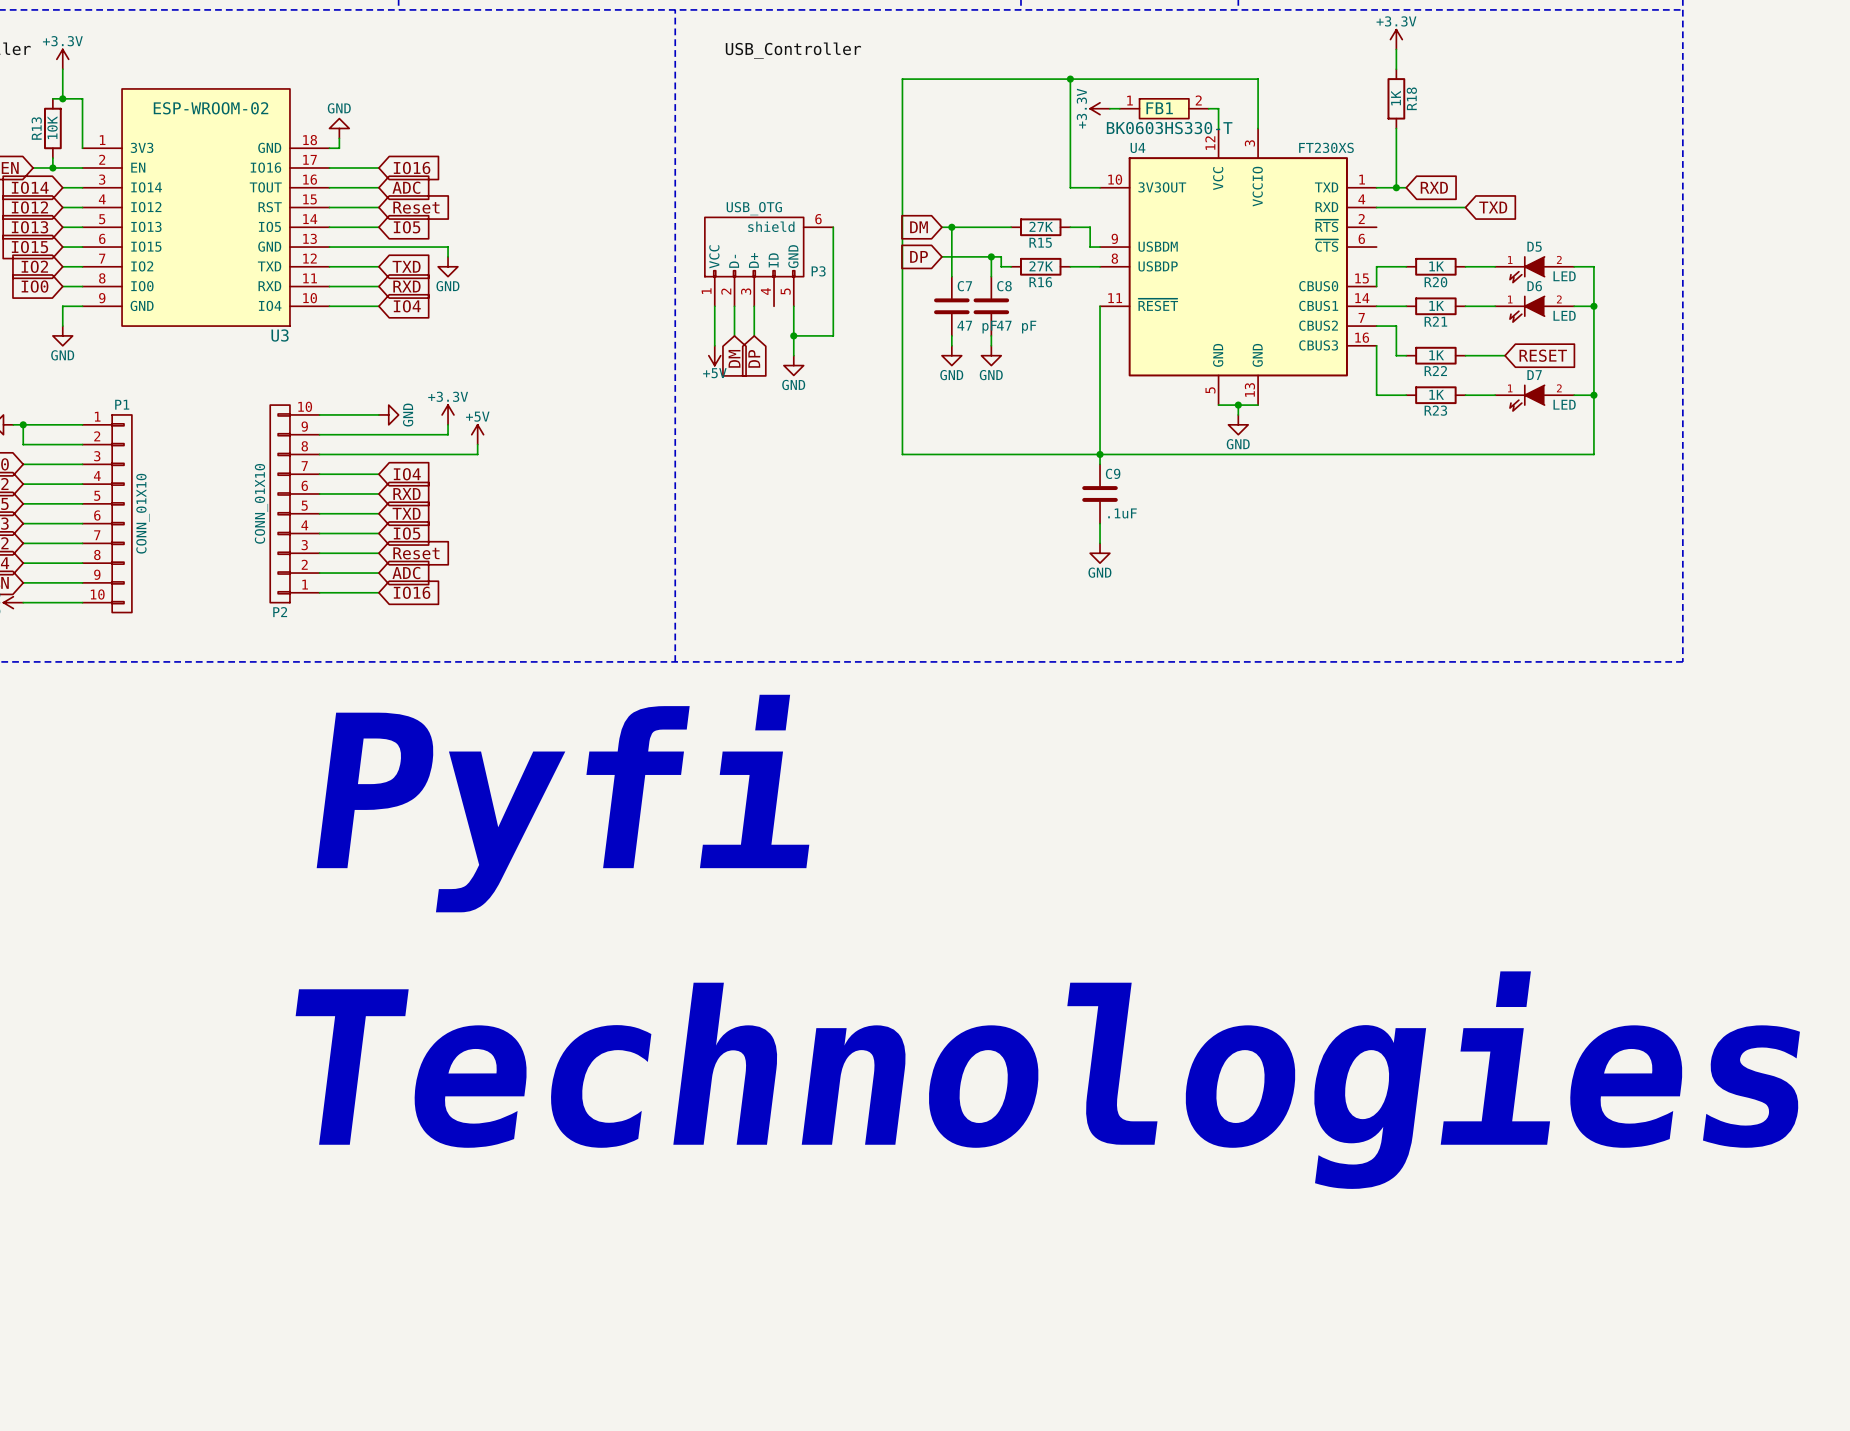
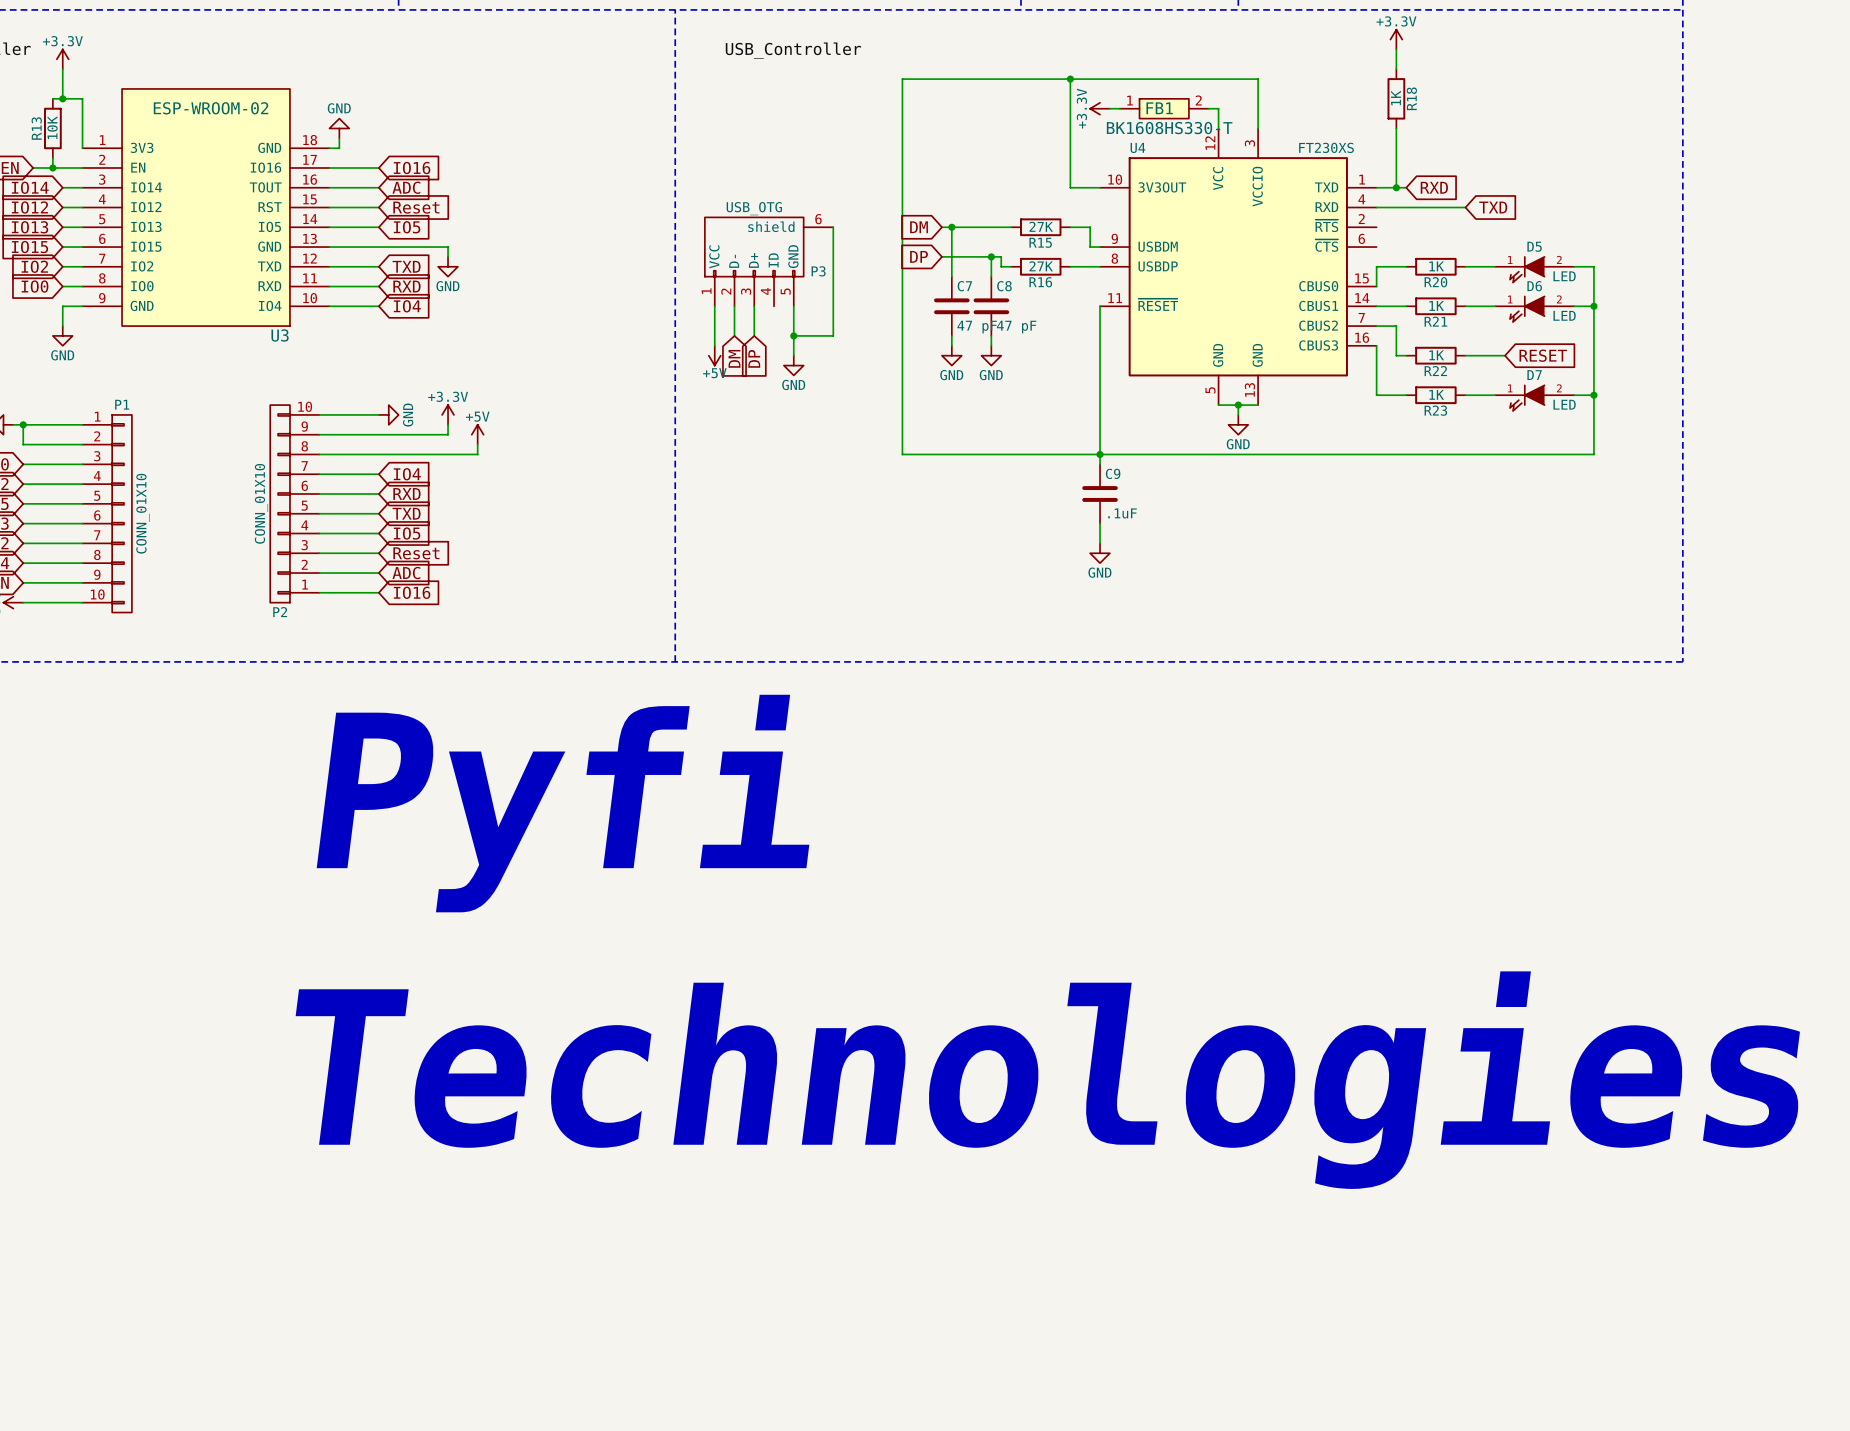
FB1 value: BK0603HS330-T (1169, 128) -> BK1608HS330-T (1169, 128)

